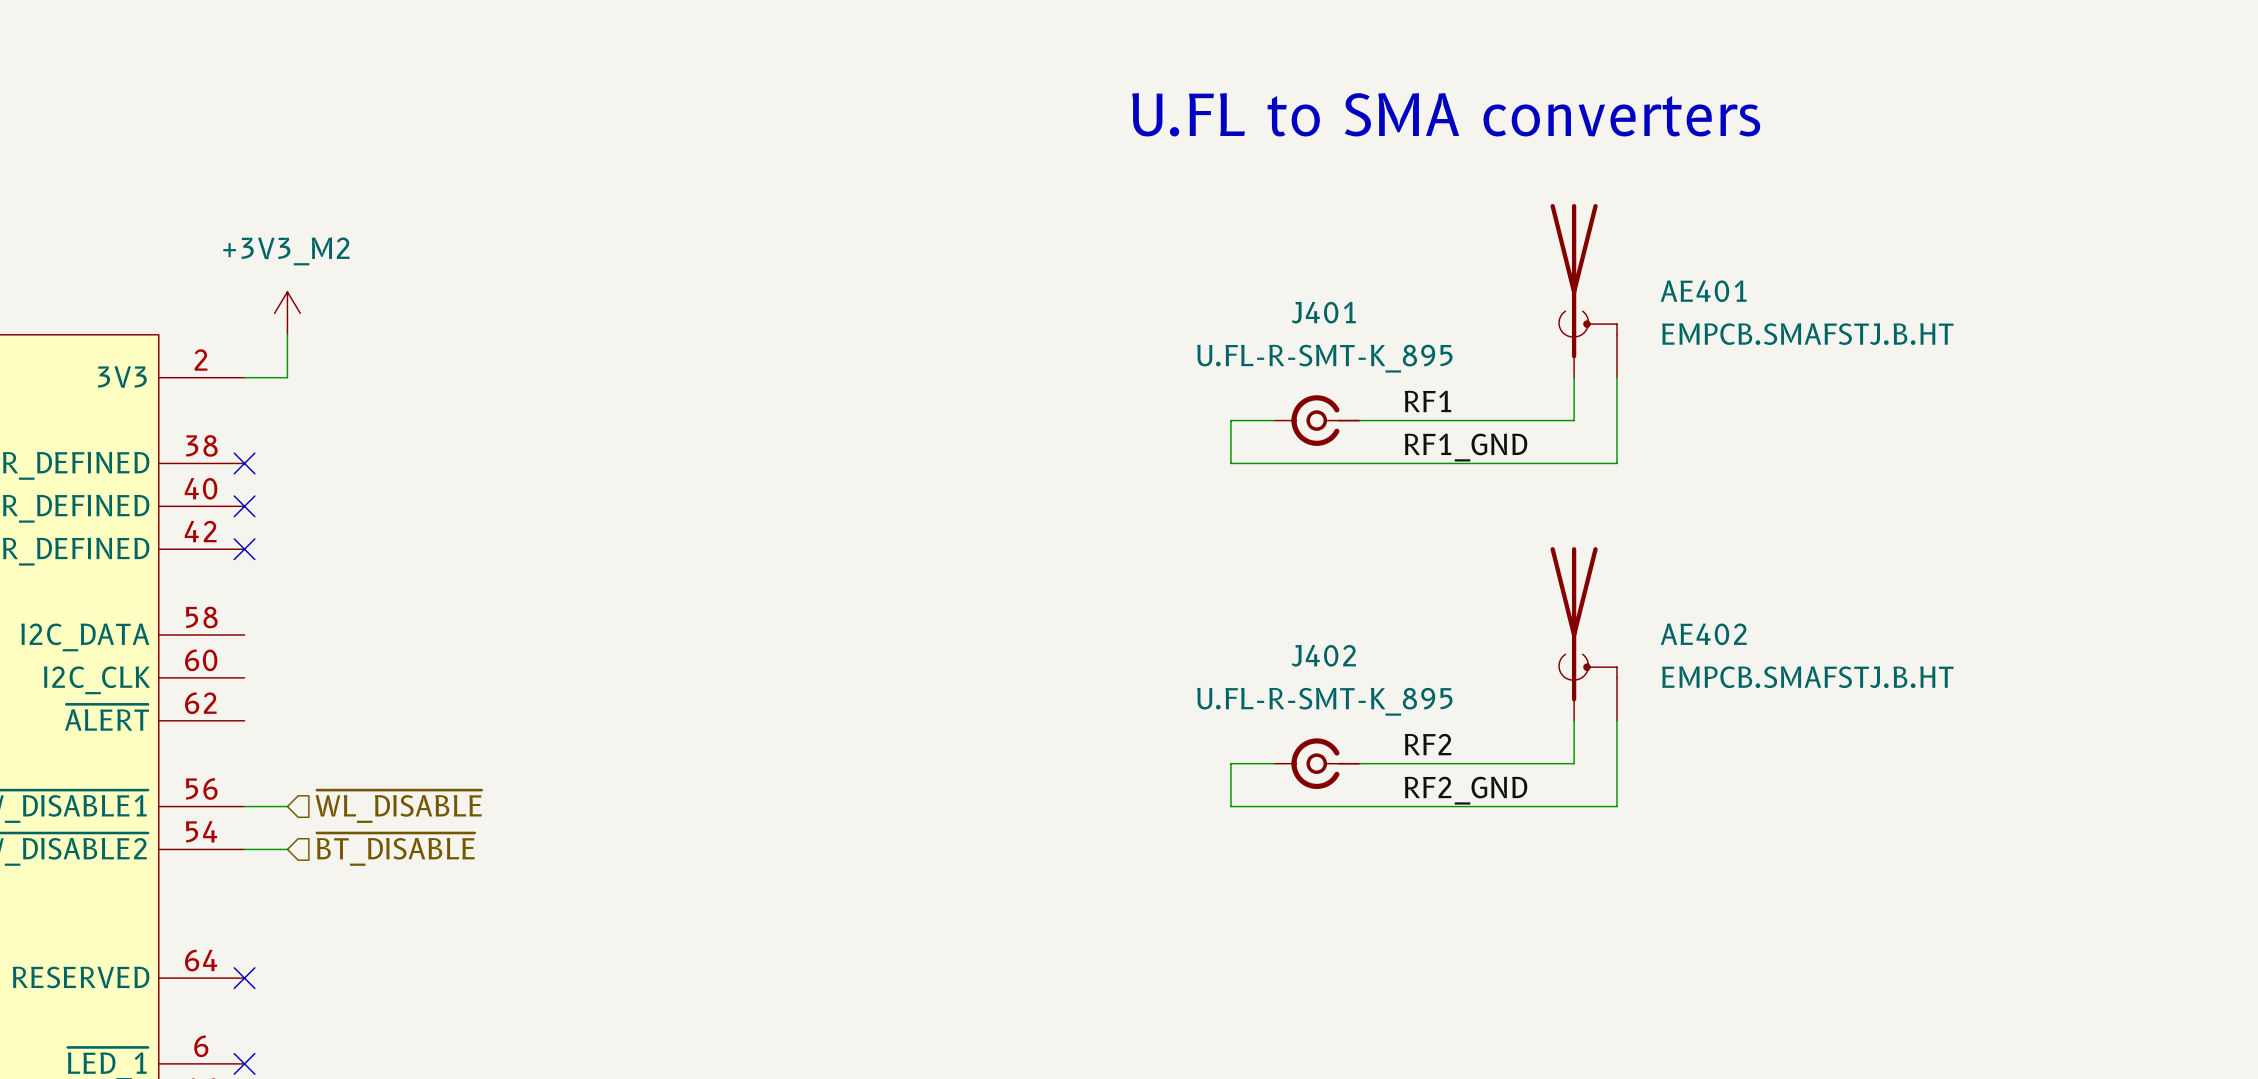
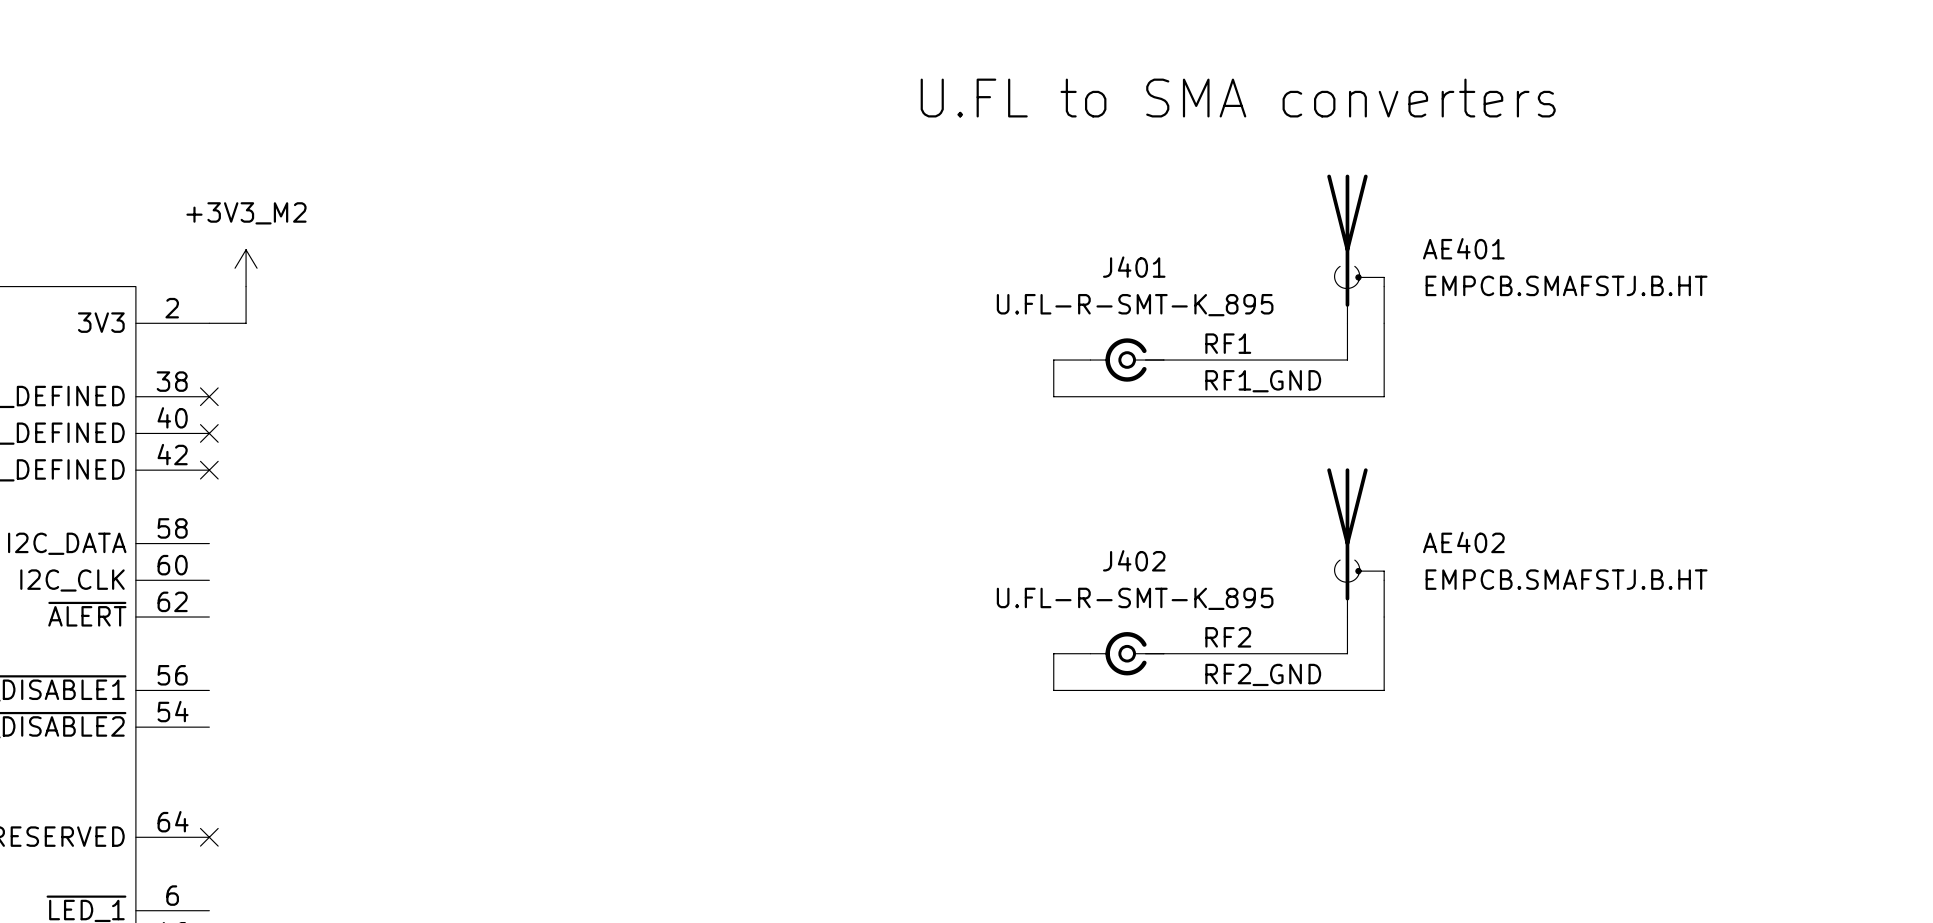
wire: (244, 806) (287, 806) -> none
hierarchical label: ~{WL_DISABLE} (398, 806) -> none
wire: (244, 849) (287, 849) -> none
hierarchical label: ~{BT_DISABLE} (395, 849) -> none
no-connect mark: (244, 1063) -> none

